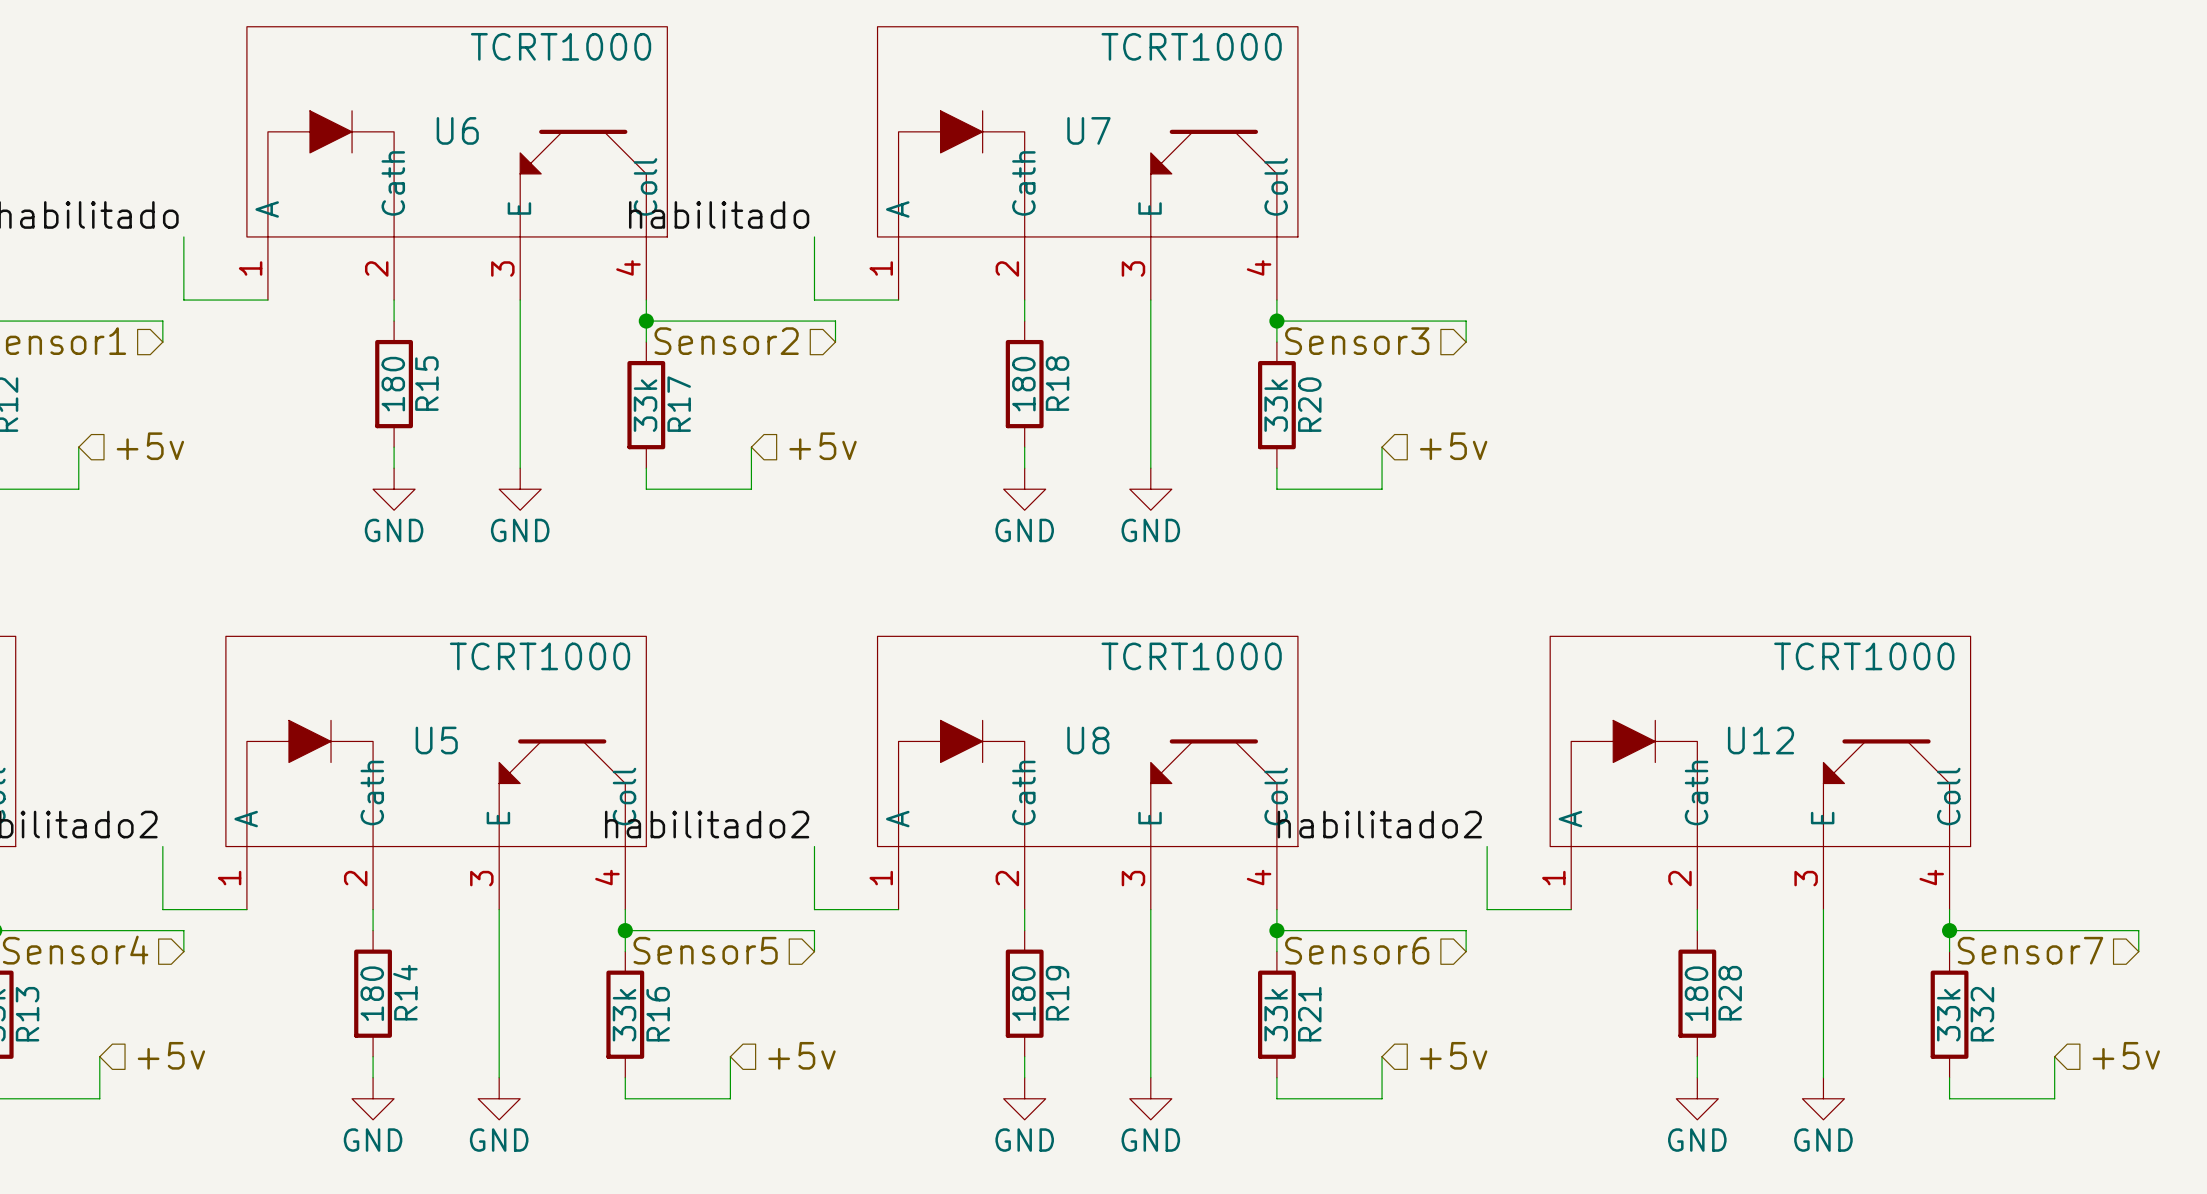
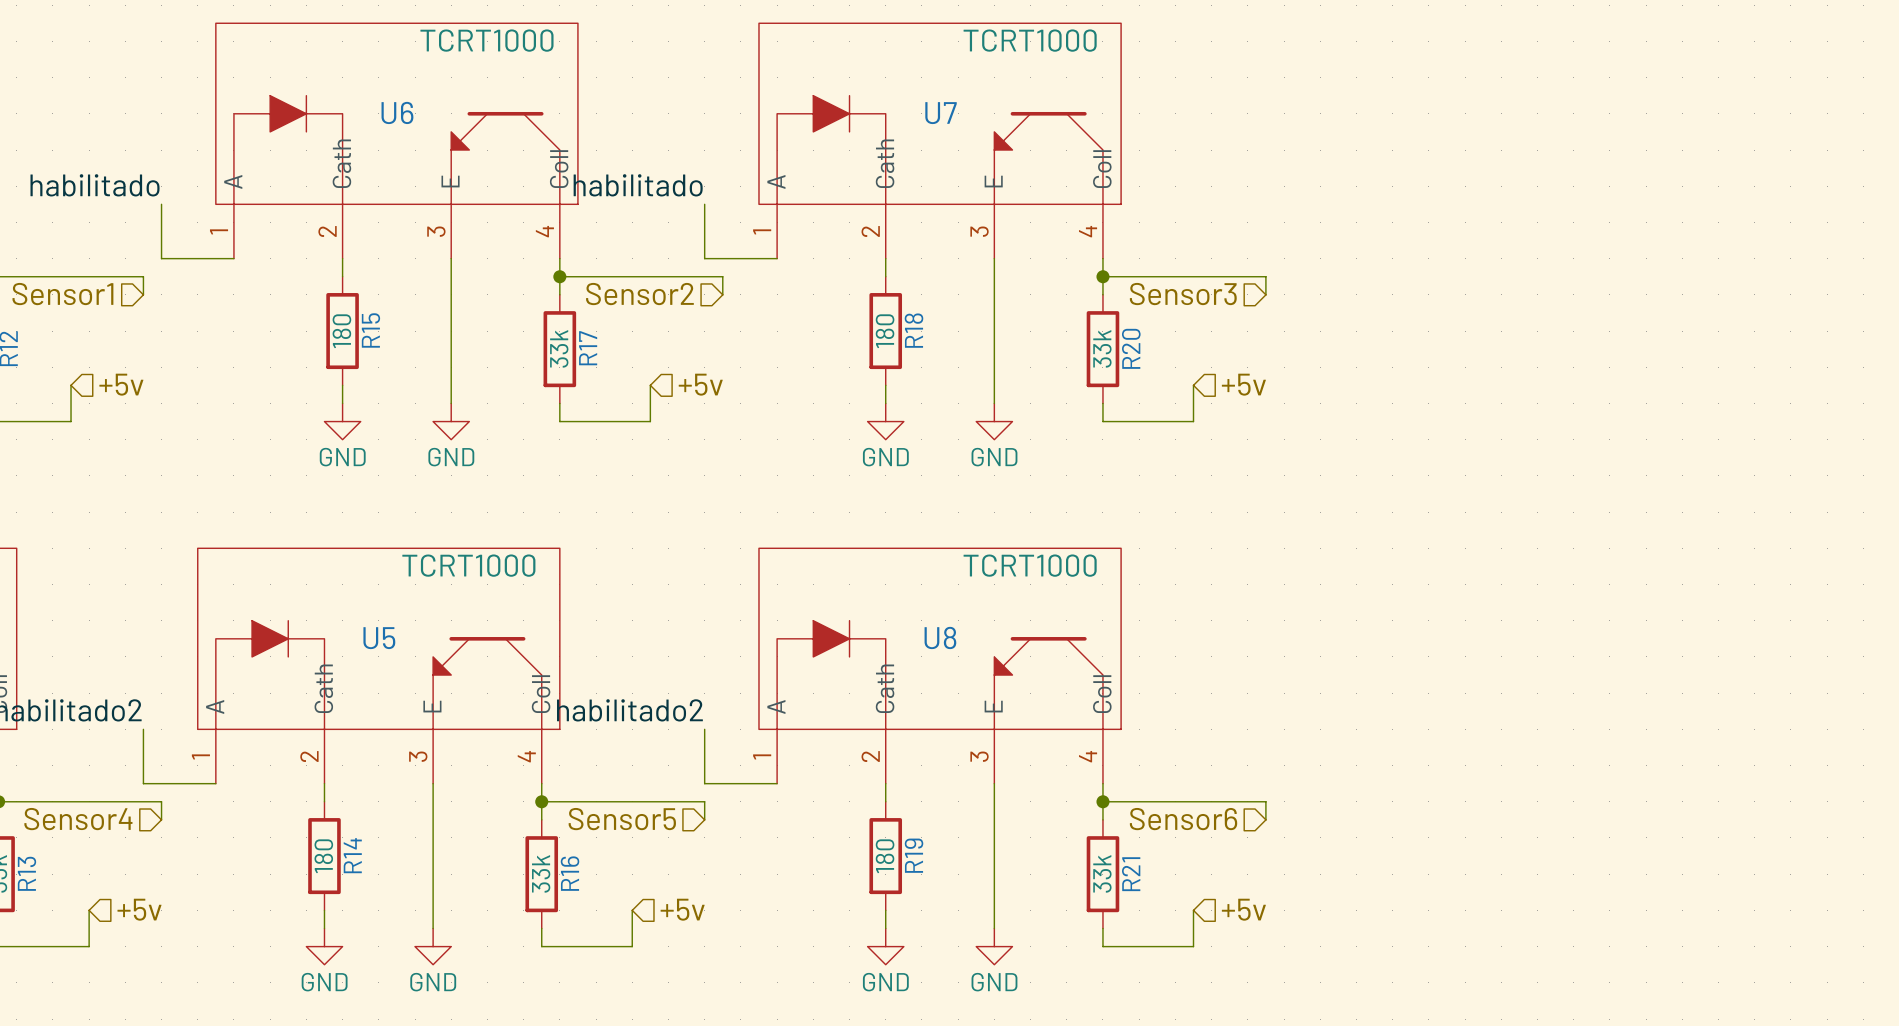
U12: TCRT1000 (1760, 772) -> none
label: habilitado2 (1379, 824) -> none
wire: (1487, 846) (1487, 909) (1571, 909) -> none
wire: (1697, 909) (1697, 930) -> none
wire: (1823, 909) (1823, 1077) -> none
wire: (1949, 909) (1949, 951) -> none
wire: (1949, 930) (2138, 930) (2138, 951) -> none
junction: (1949, 930) -> none
hierarchical label: Sensor7 (2030, 950) -> none
R28: 180 (1697, 993) -> none
R32: 33k (1949, 1014) -> none
hierarchical label: +5v (2126, 1055) -> none
wire: (1697, 1056) (1697, 1077) -> none
wire: (2054, 1056) (2054, 1098) (1949, 1098) (1949, 1077) -> none
power symbol: GND (1697, 1098) -> none
power symbol: GND (1823, 1098) -> none

